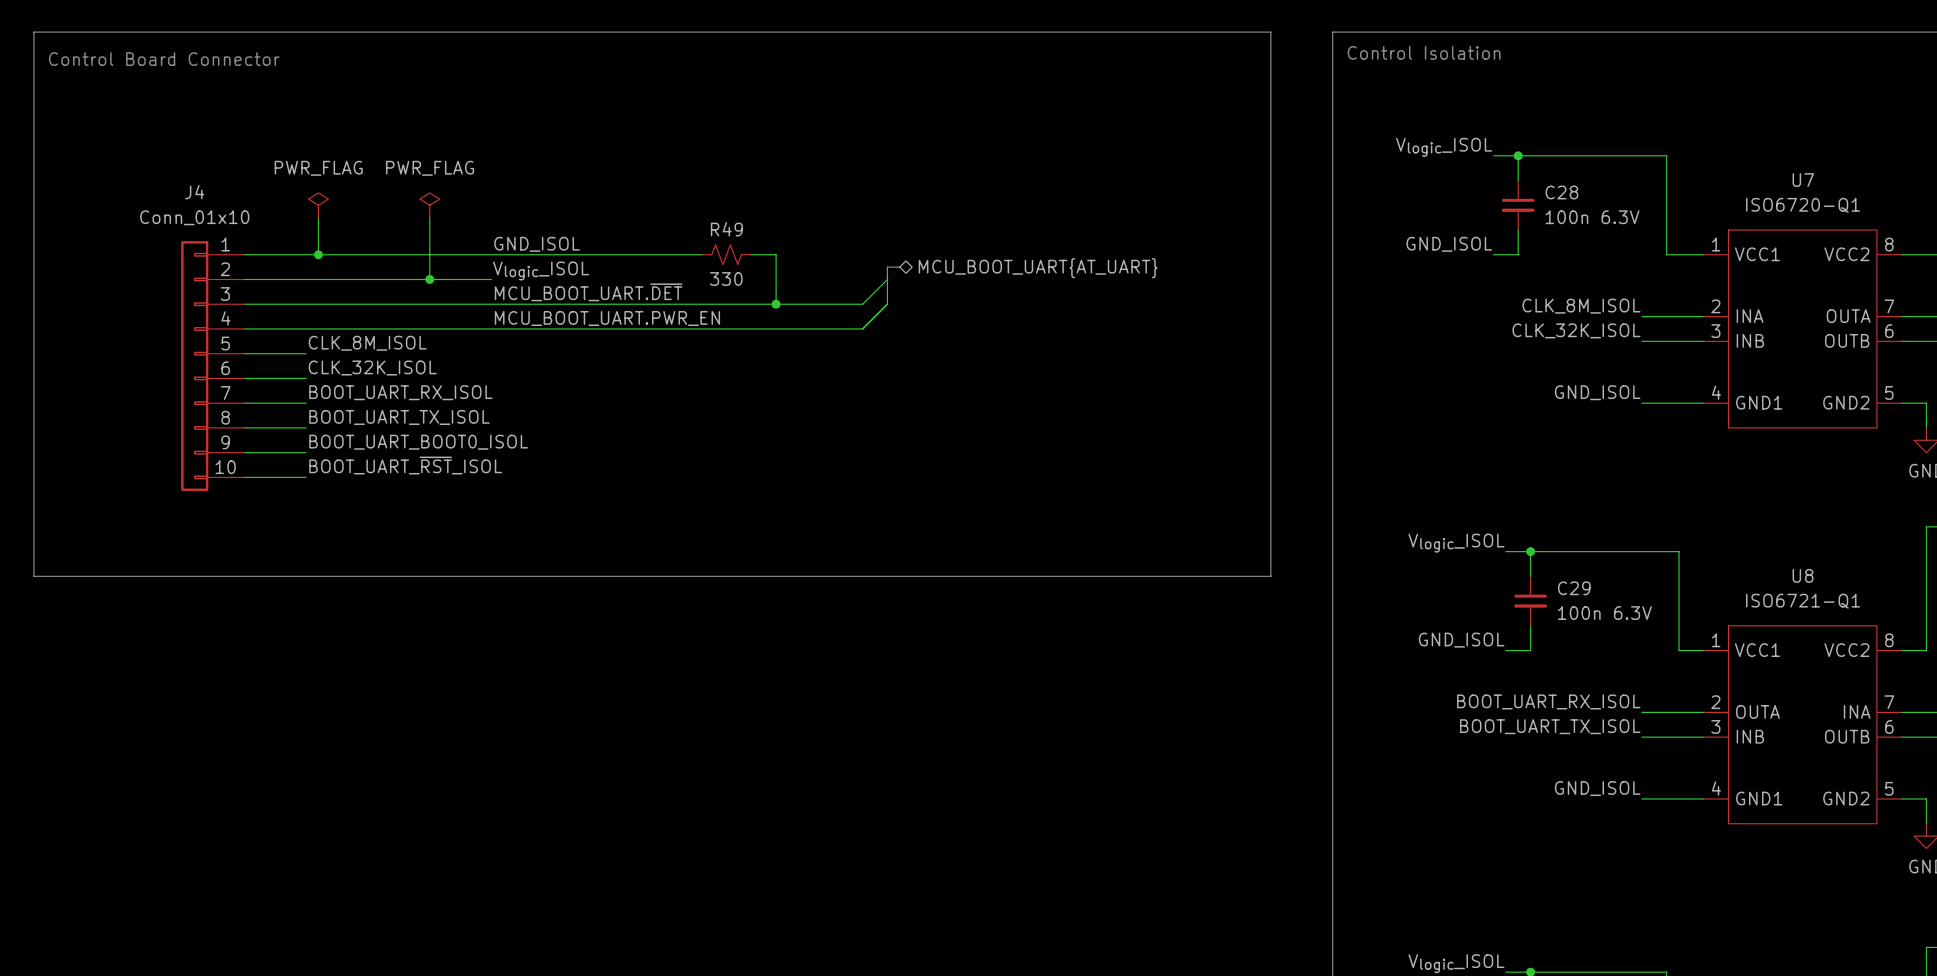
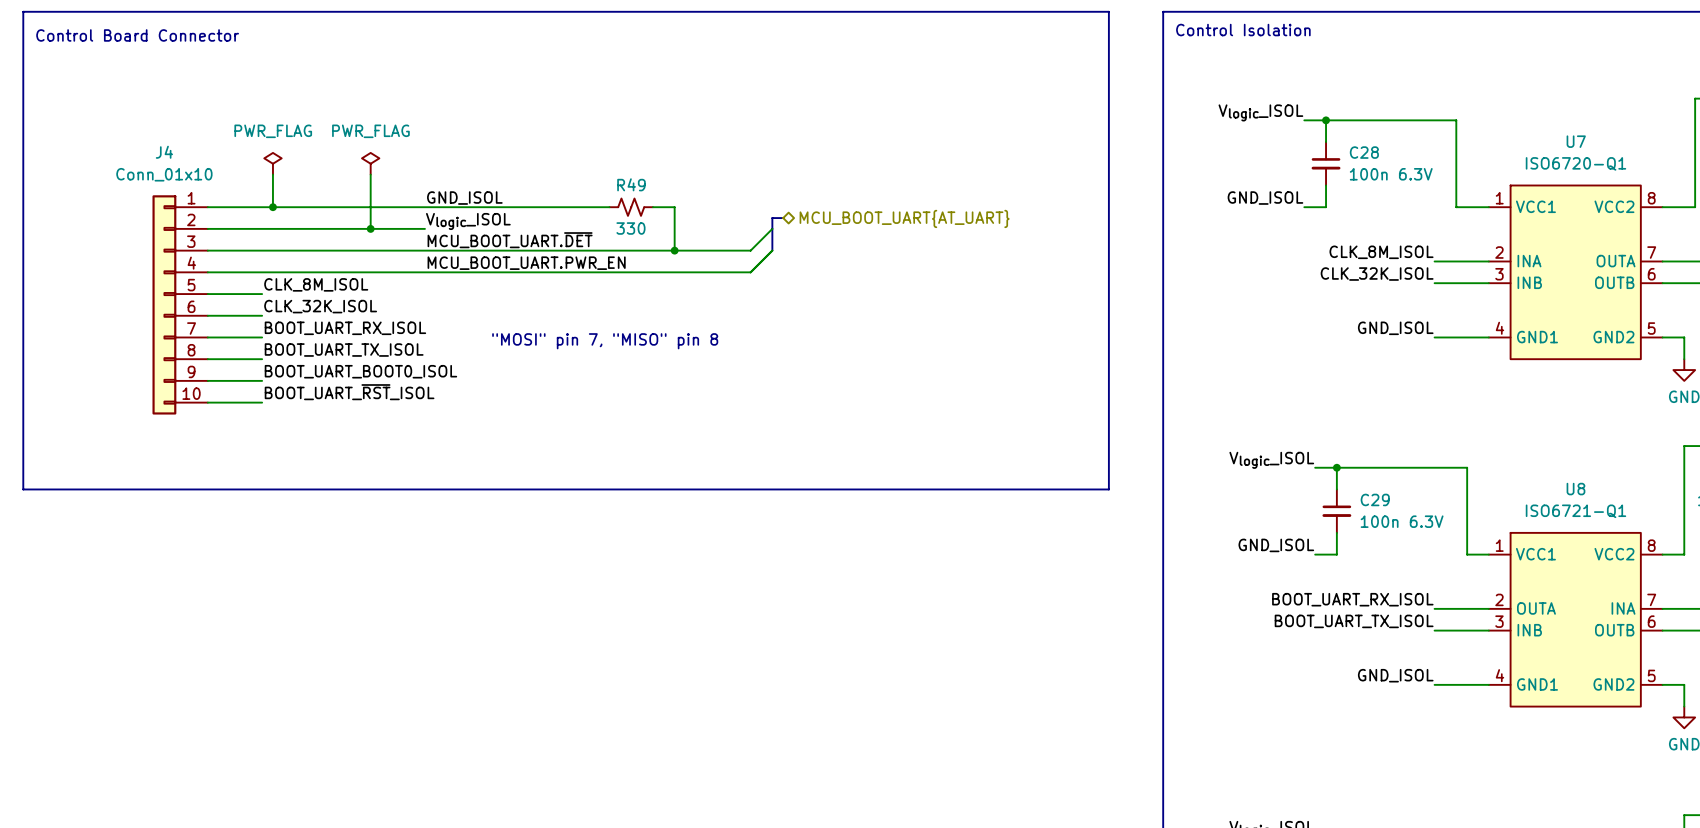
text: none -> "MOSI" pin 7, "MISO" pin 8 (605, 341)

